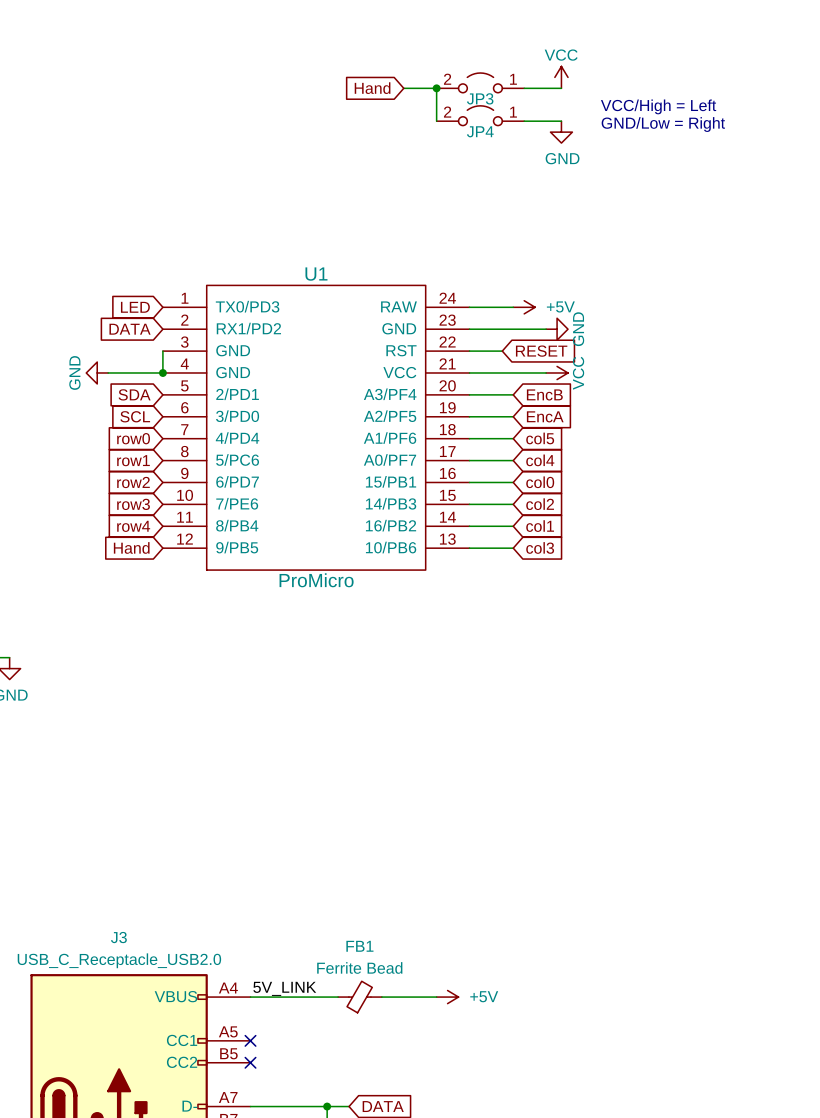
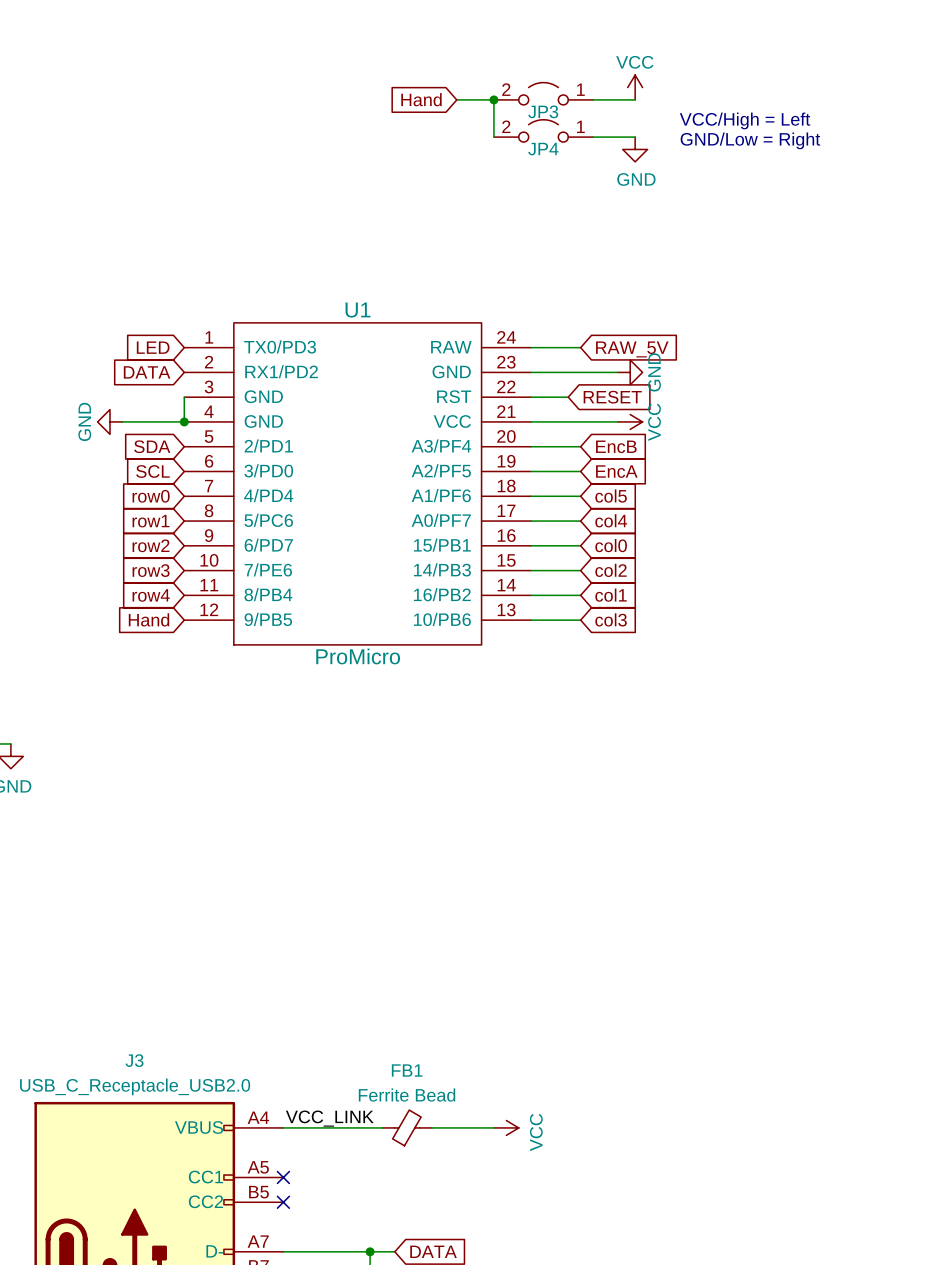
power symbol: +5V (524, 307) -> none
global label: none -> RAW_5V (632, 349)
label: 5V_LINK (284, 988) -> VCC_LINK (329, 1118)
power symbol: +5V (447, 997) -> VCC (506, 1127)

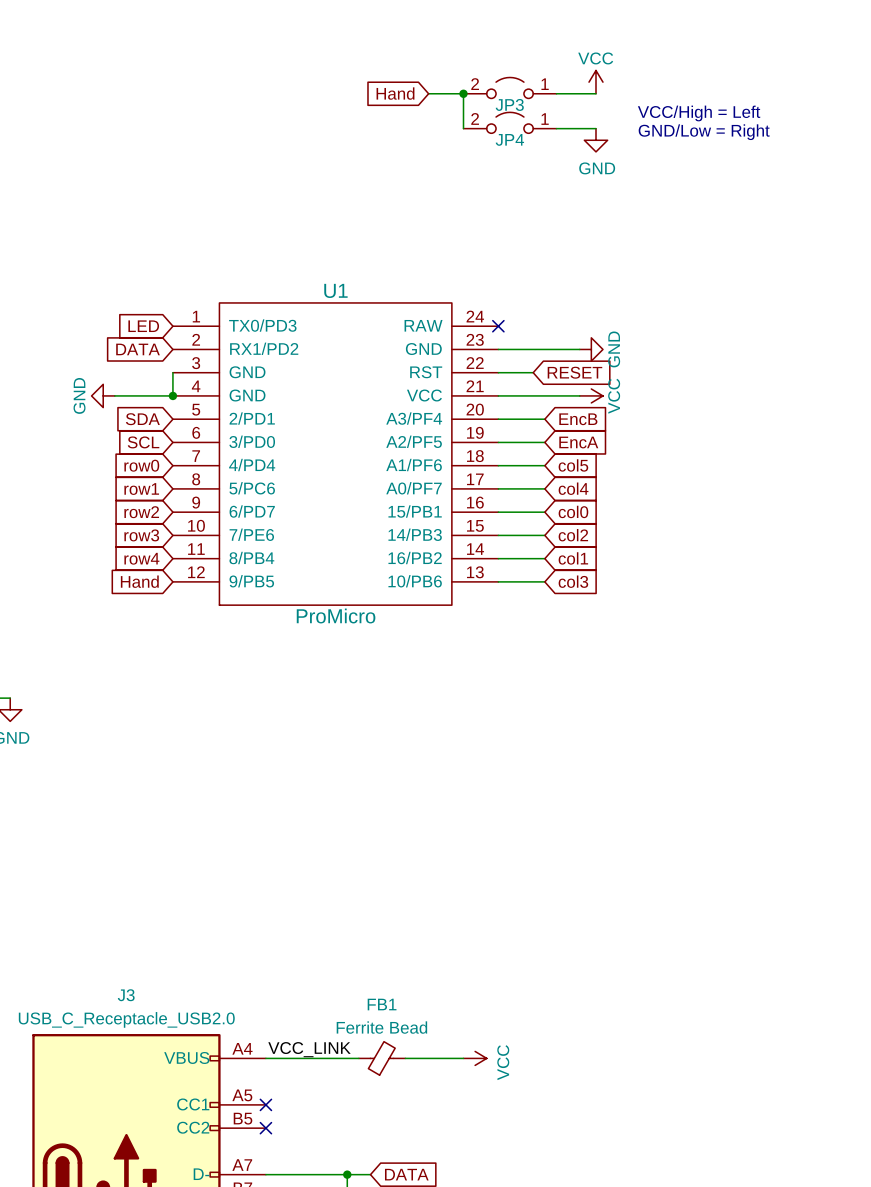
wire: (531, 347) (580, 347) -> none
no-connect mark: none -> (498, 326)
global label: RAW_5V (632, 349) -> none

